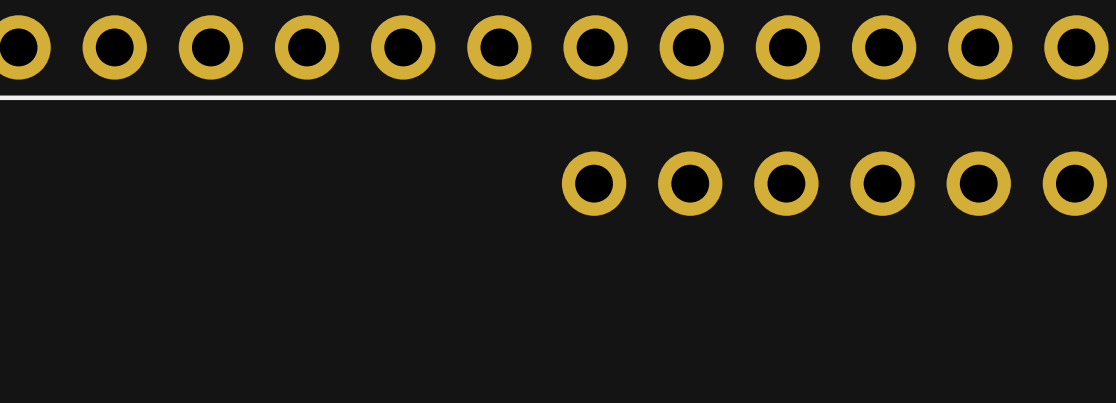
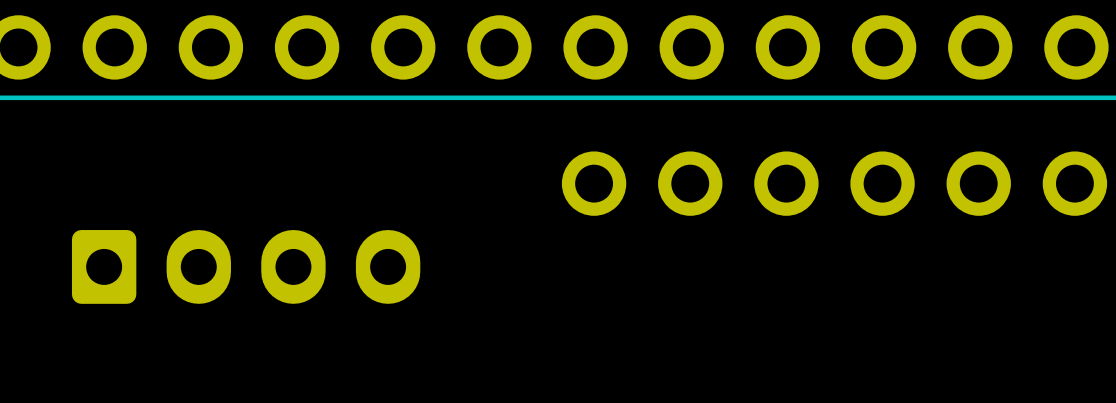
part: none -> (246, 266)

